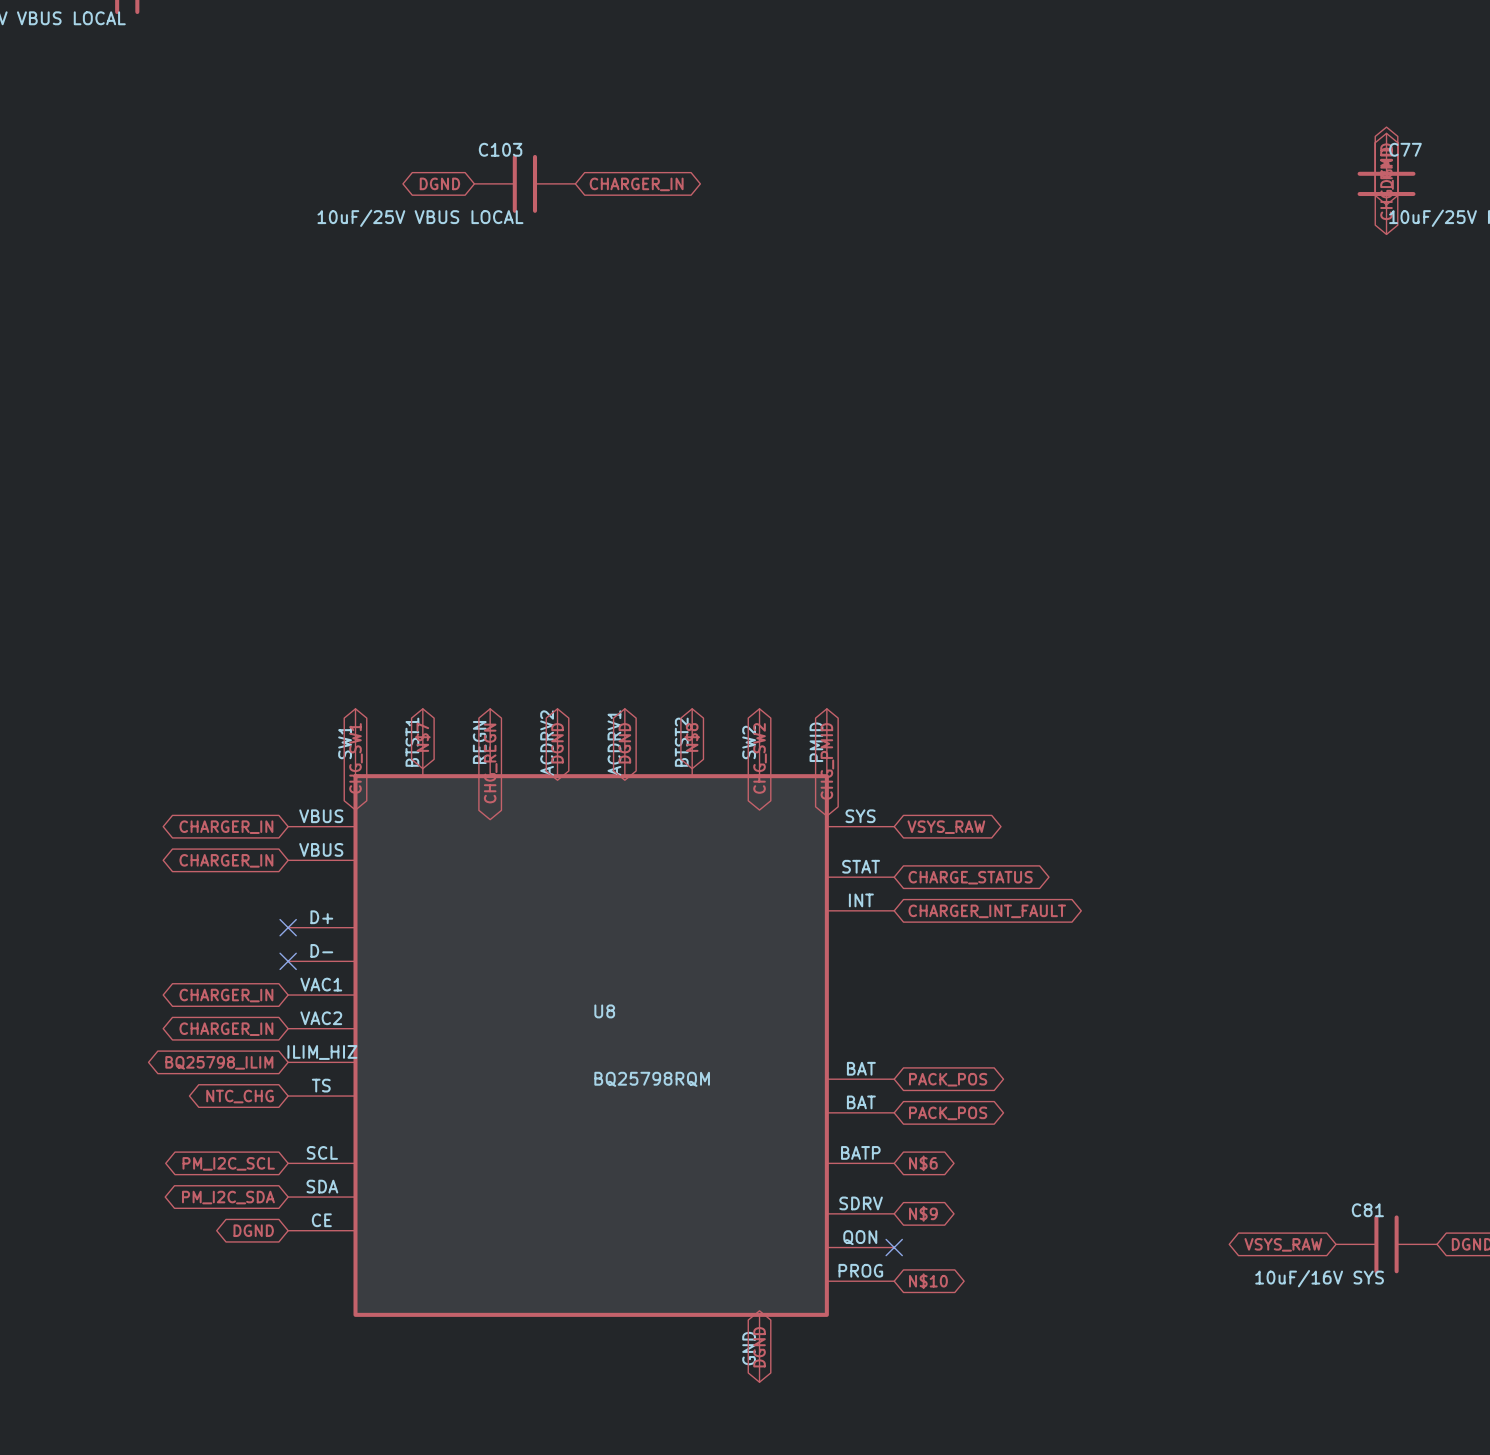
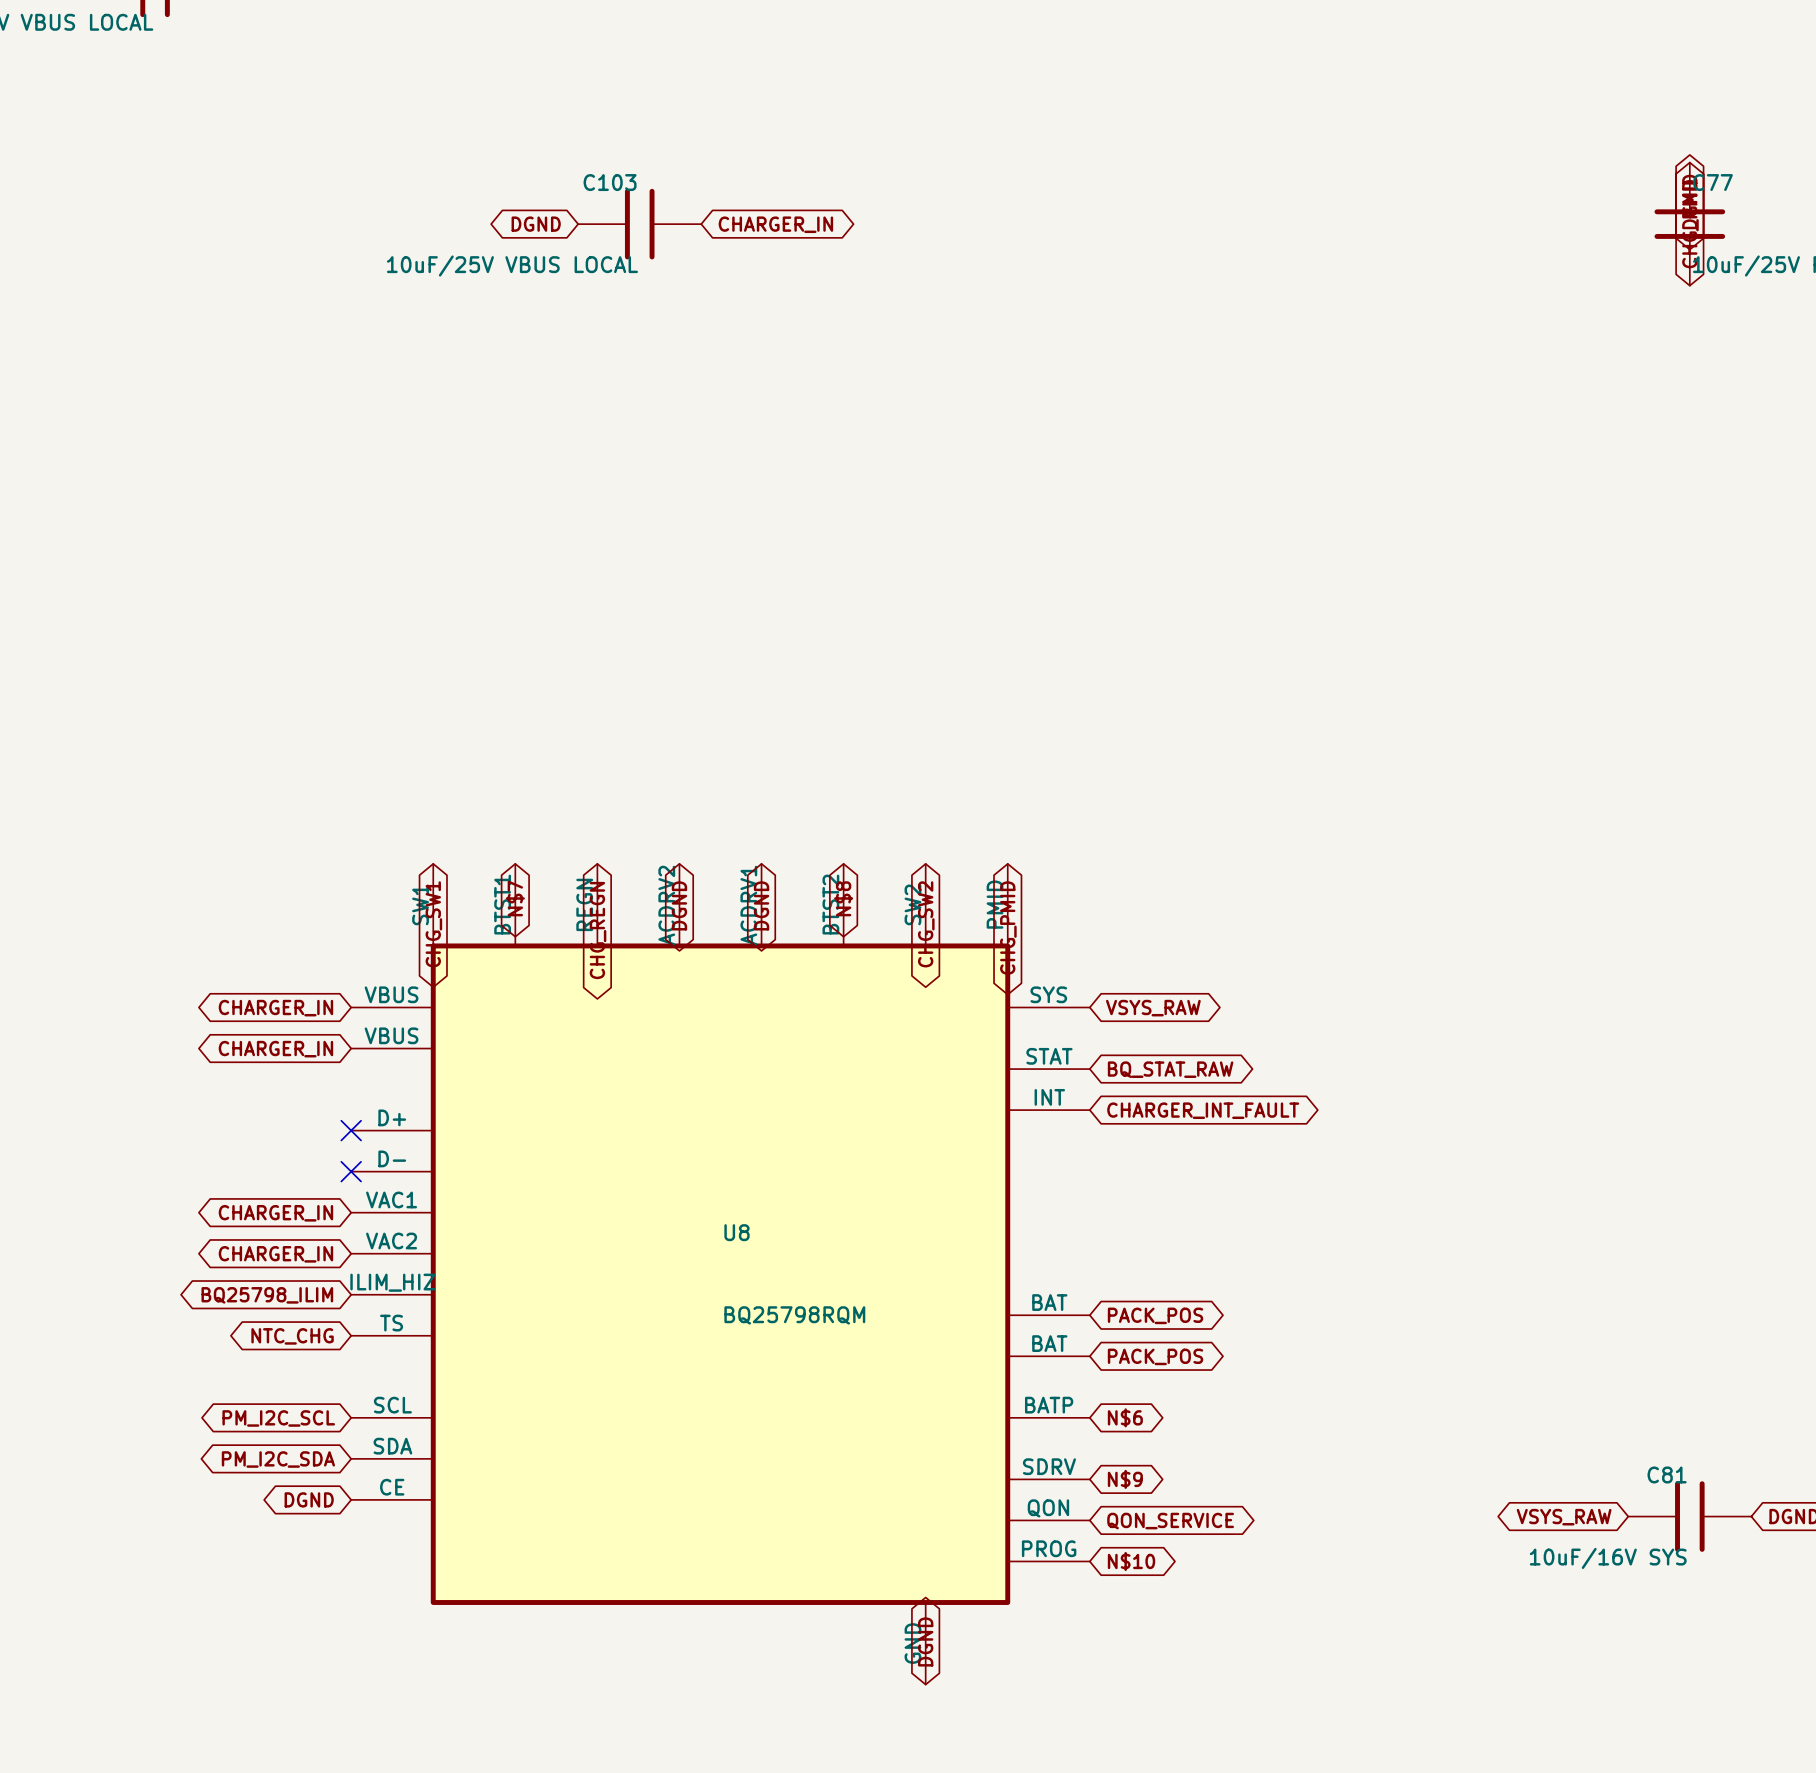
global label: CHARGE_STATUS (970, 877) -> BQ_STAT_RAW (1170, 1069)
no-connect mark: (894, 1247) -> none
global label: none -> QON_SERVICE (1170, 1521)

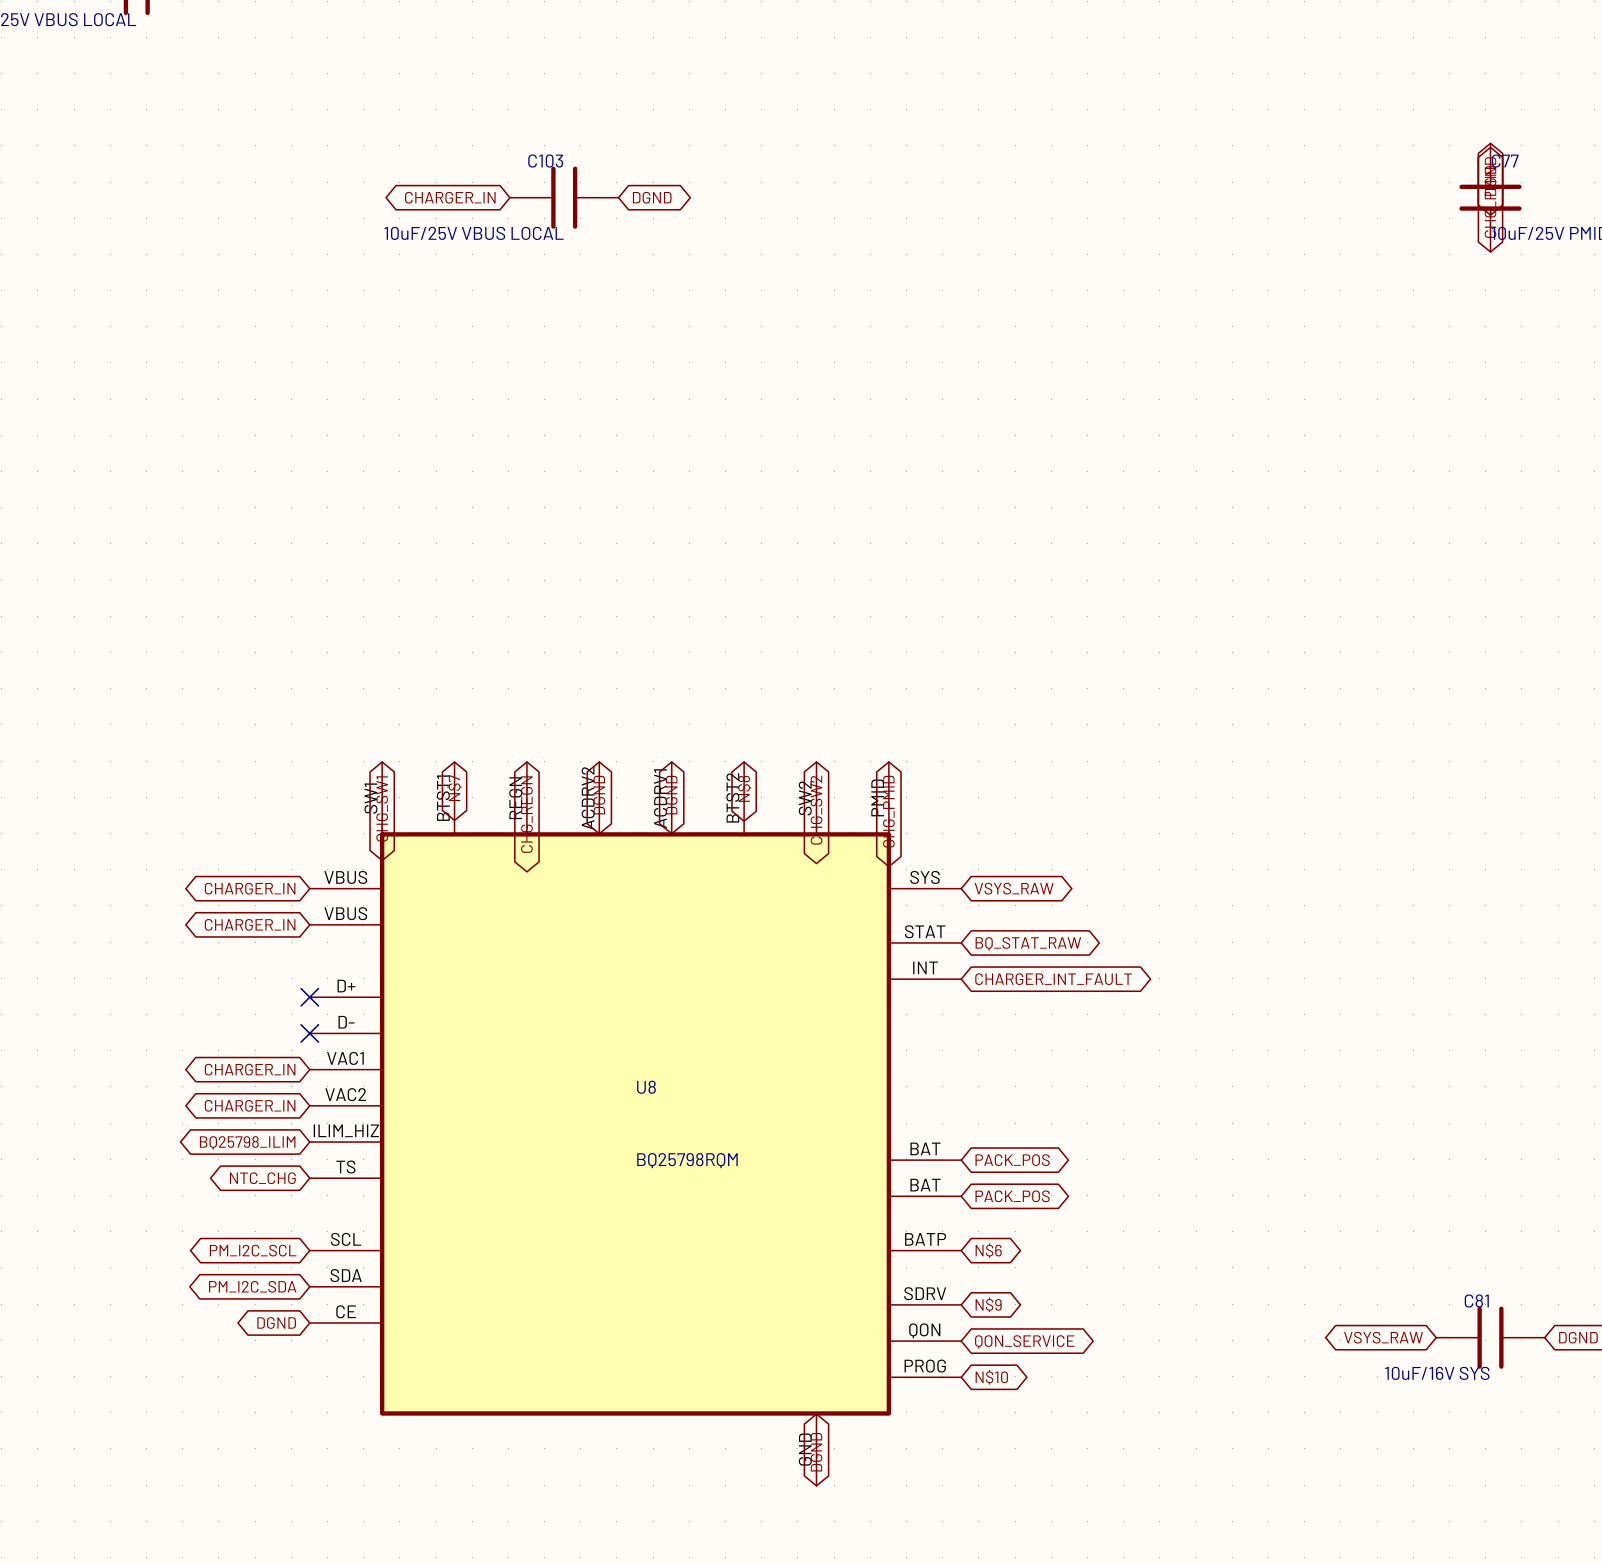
global label: DGND (536, 224) -> CHARGER_IN (450, 197)
global label: CHARGER_IN (775, 224) -> DGND (652, 197)

